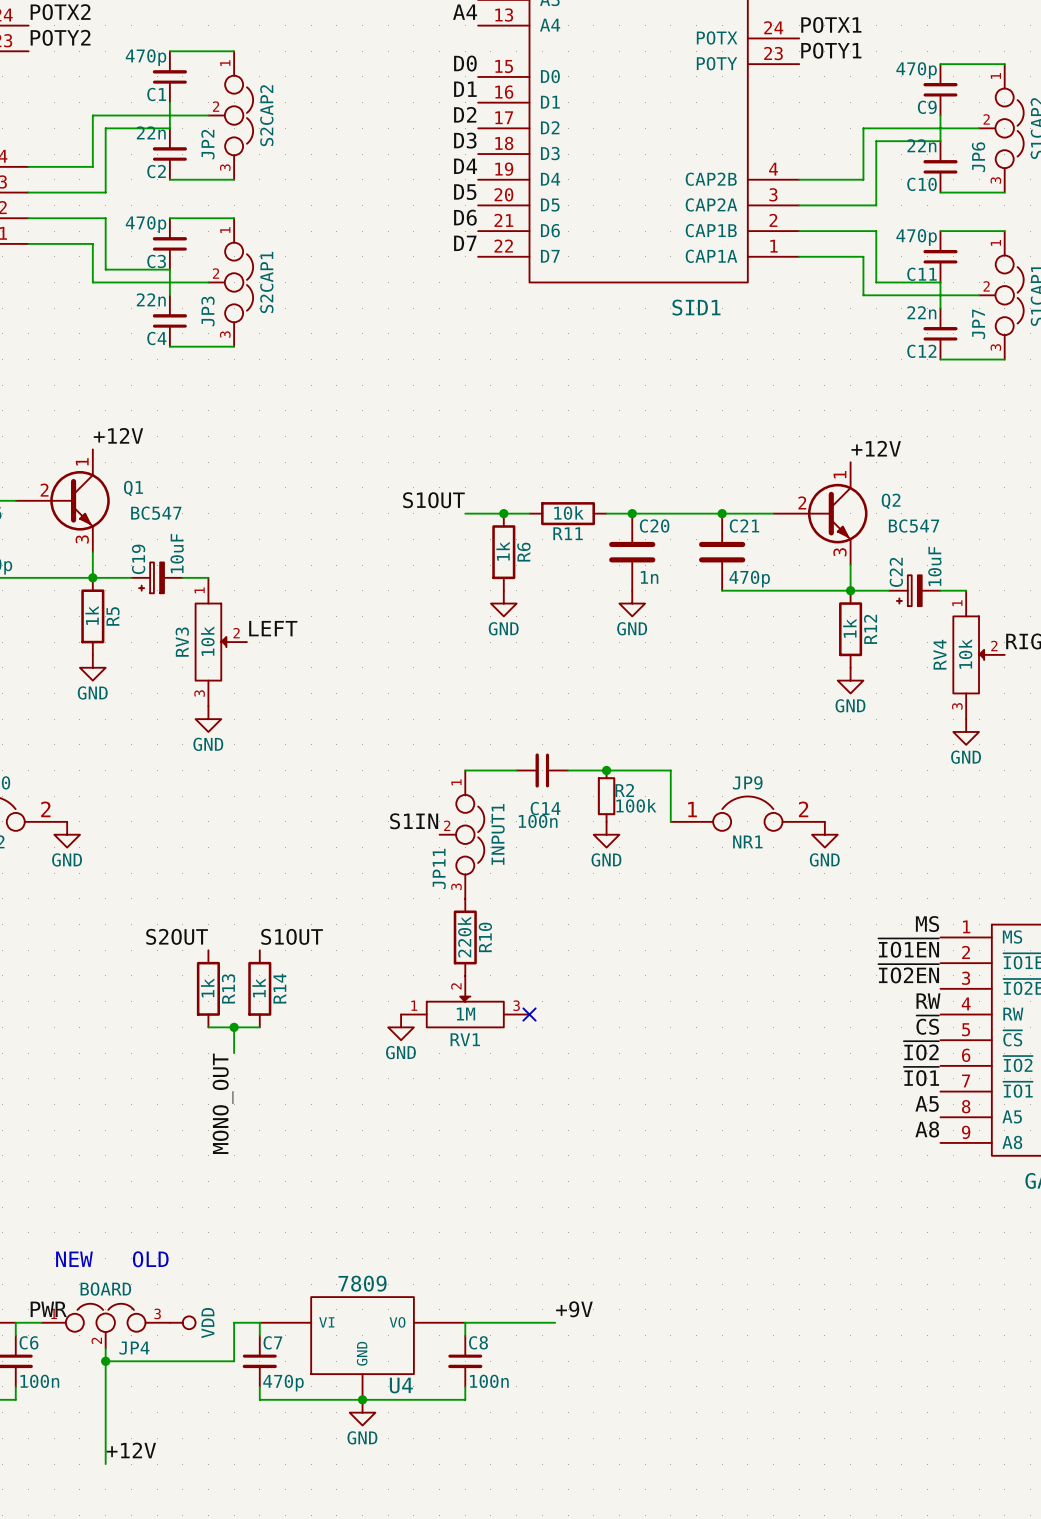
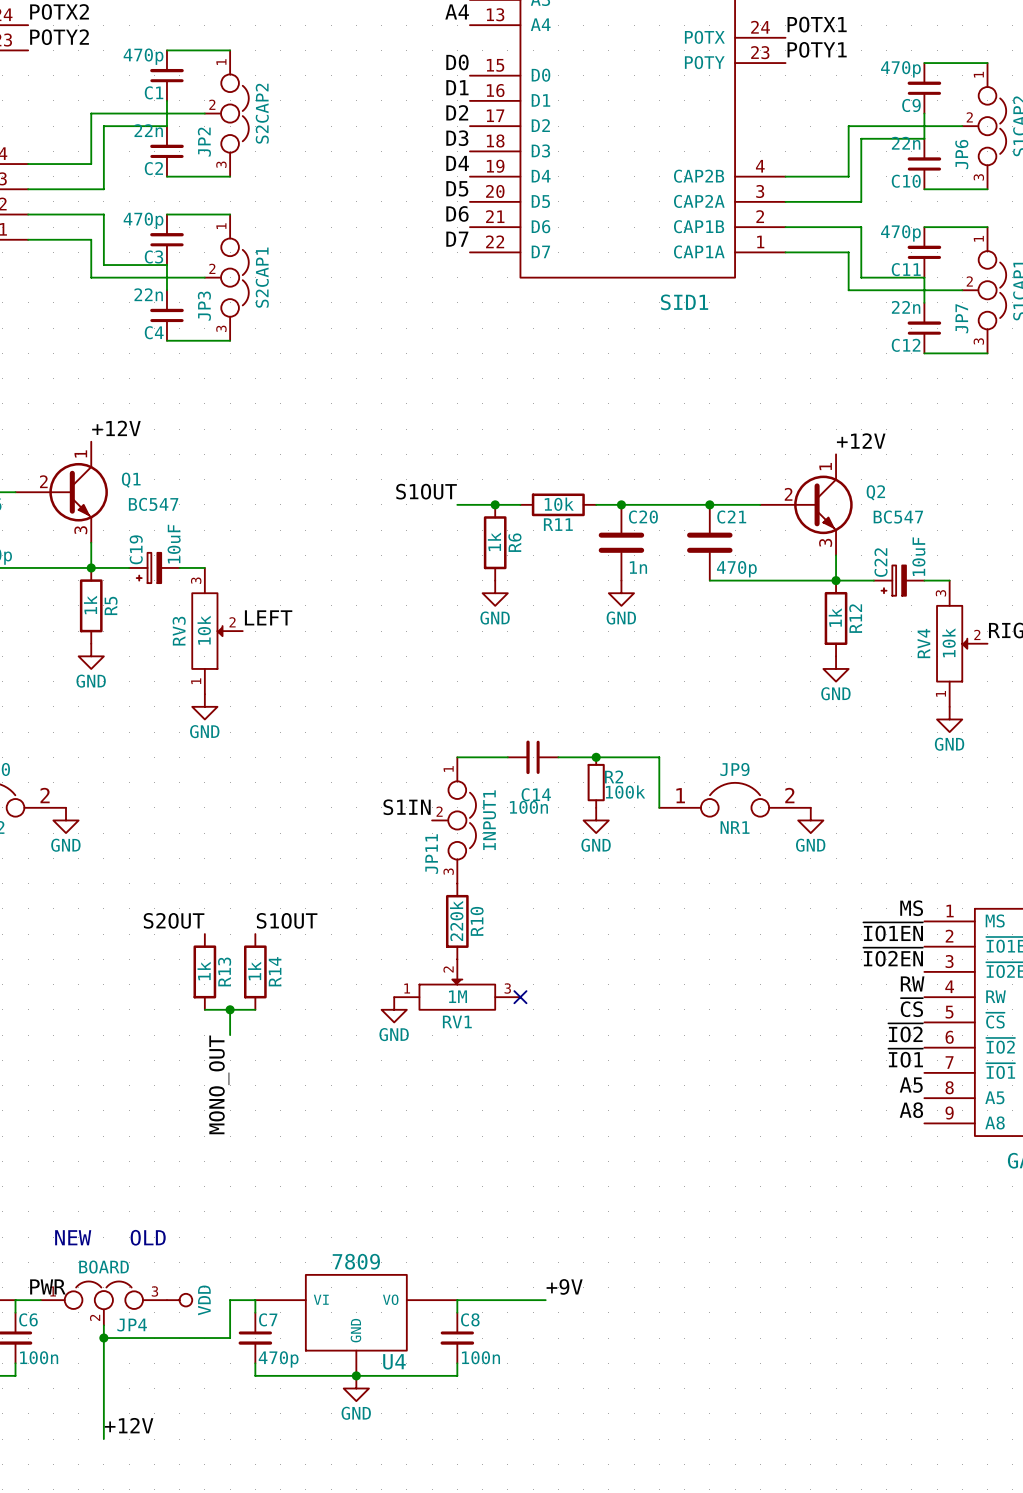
RV3 flip: as is (210, 642) -> up-down (207, 631)
RV4 flip: as is (968, 654) -> up-down (952, 643)

